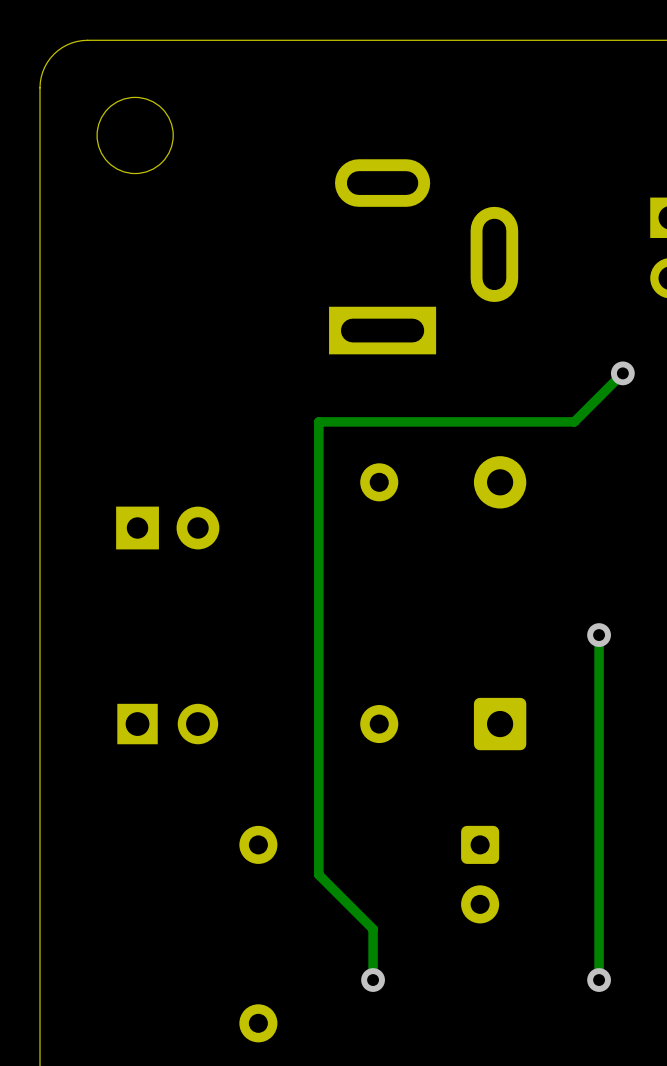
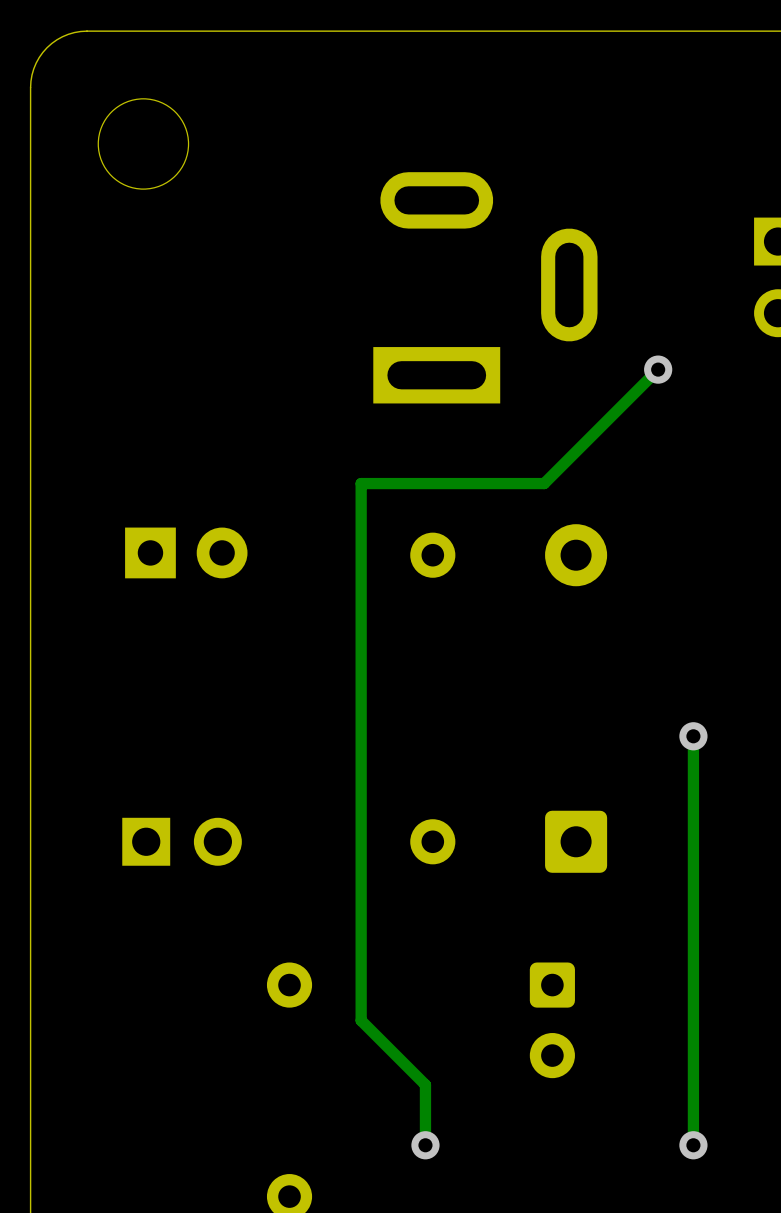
track: (622, 373) (574, 421) (473, 421) -> (658, 369) (544, 483)
via position: (622, 373) -> (658, 369)
part position: (167, 528) -> (186, 552)

